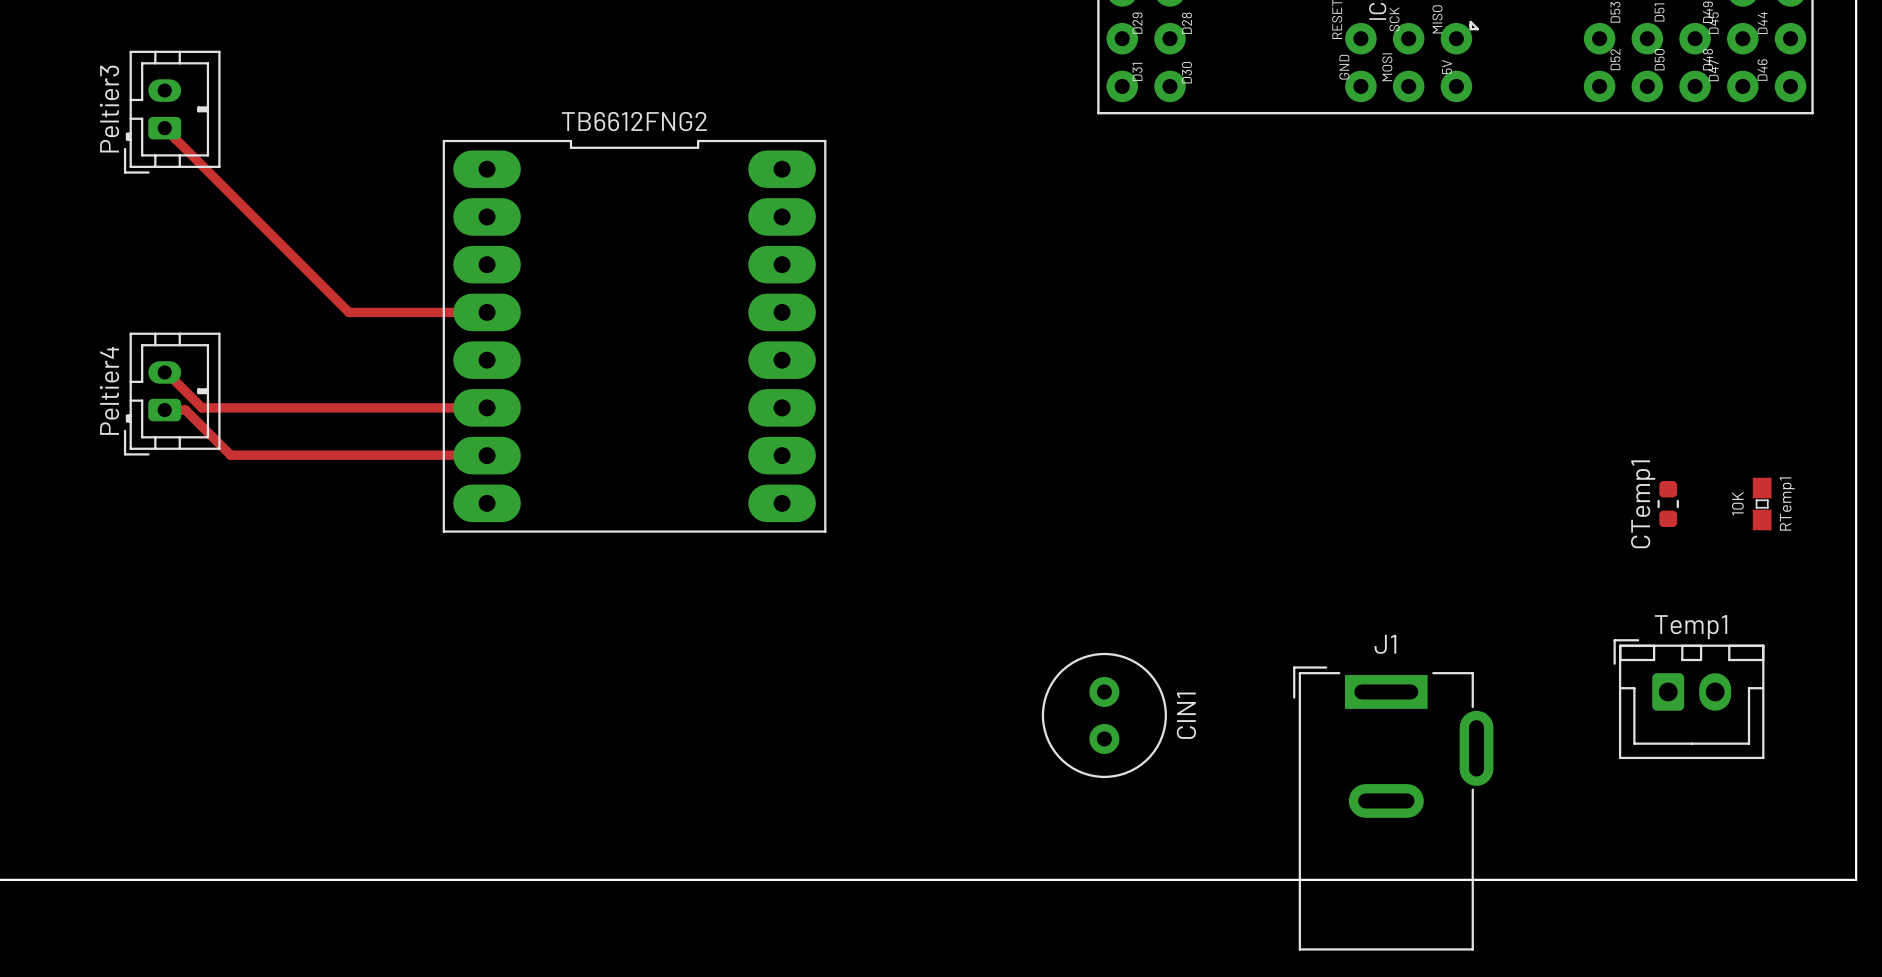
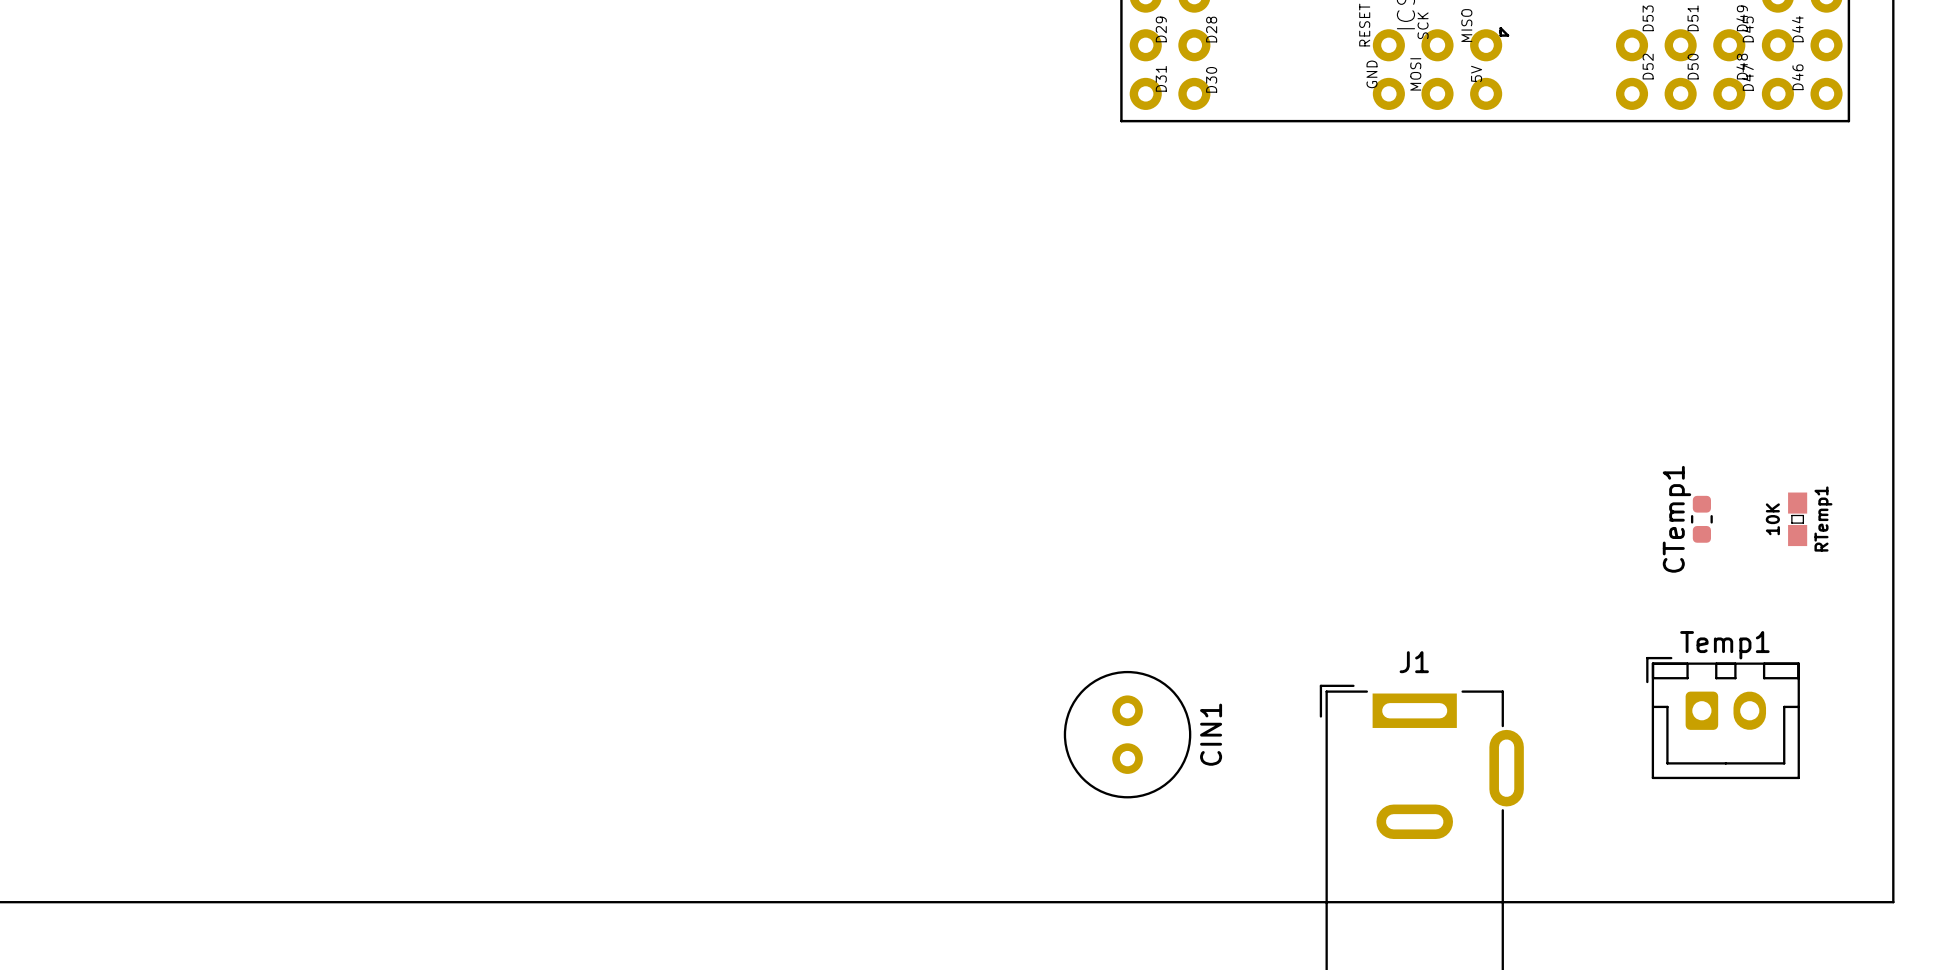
Peltier3: (172, 112) -> none
top track: (164, 128) (348, 312) (487, 312) -> none
TB6612FNG2: (634, 336) -> none
top track: (166, 372) (202, 407) (487, 407) -> none
Peltier4: (172, 394) -> none
top track: (164, 410) (185, 410) (230, 455) (487, 455) -> none

